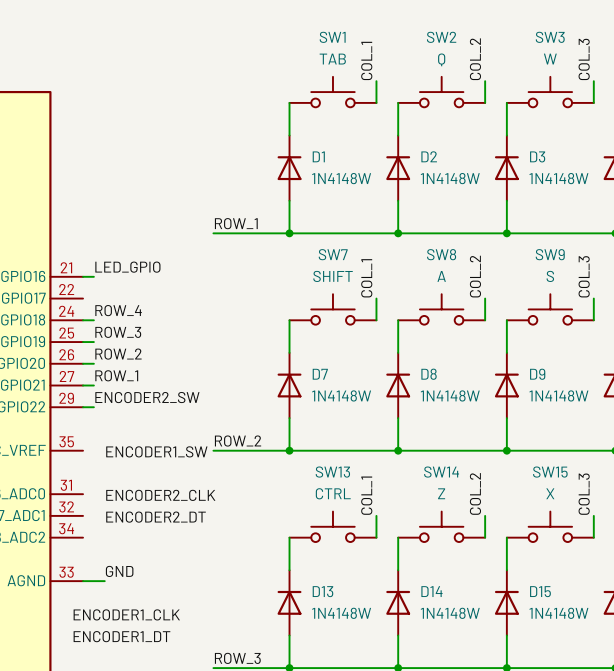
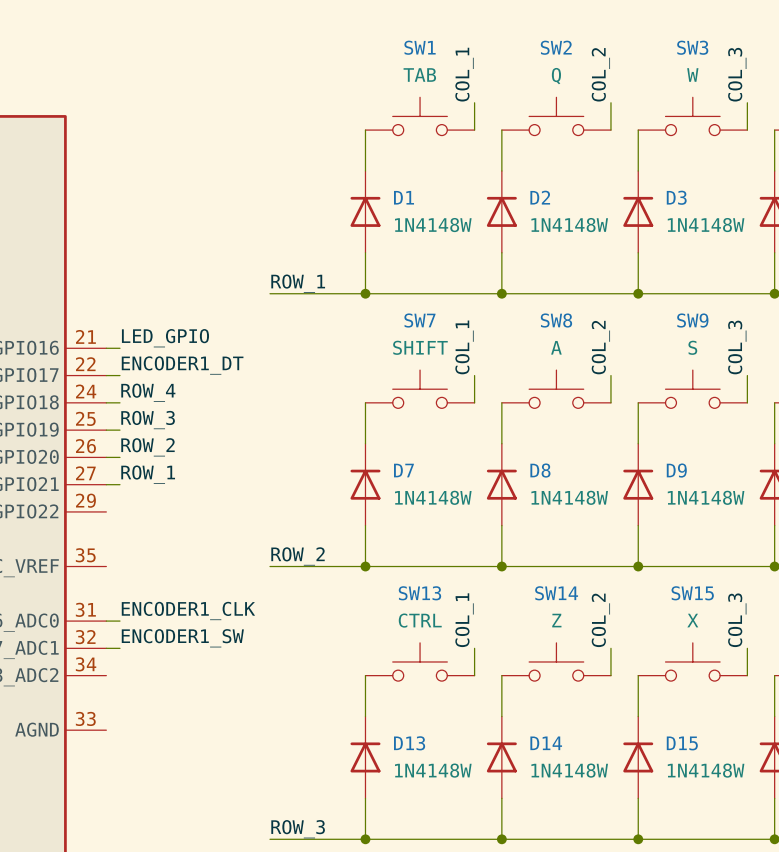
label: none -> ENCODER1_DT (182, 365)
wire: none -> (106, 375) (119, 375)
label: ENCODER2_SW (147, 397) -> none
wire: (83, 407) (93, 407) -> (106, 621) (119, 621)
label position: ENCODER1_SW (156, 451) -> ENCODER1_SW (182, 638)
label: ENCODER2_CLK (160, 495) -> none
wire: none -> (106, 648) (119, 648)
label: ENCODER2_DT (156, 517) -> none
label: GND (119, 571) -> none
wire: (83, 581) (104, 581) -> none
label position: ENCODER1_CLK (126, 614) -> ENCODER1_CLK (188, 610)
label: ENCODER1_DT (121, 636) -> none

